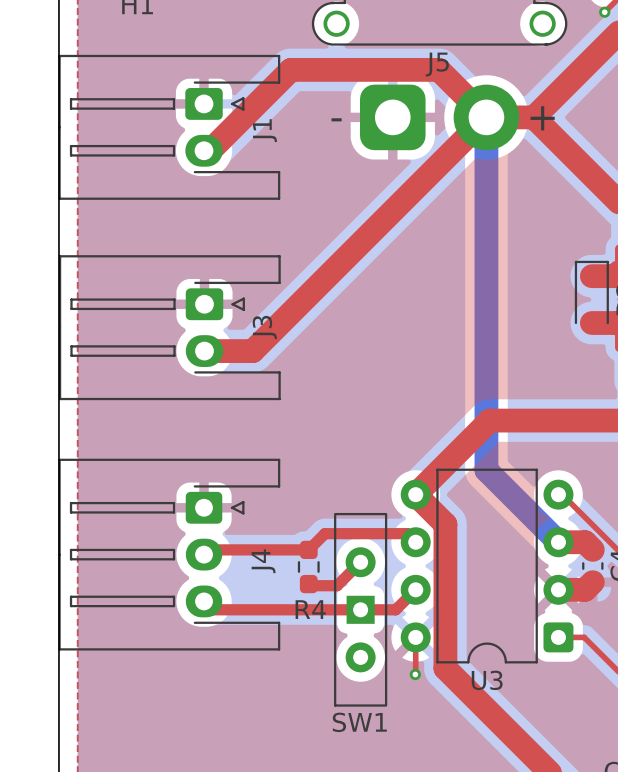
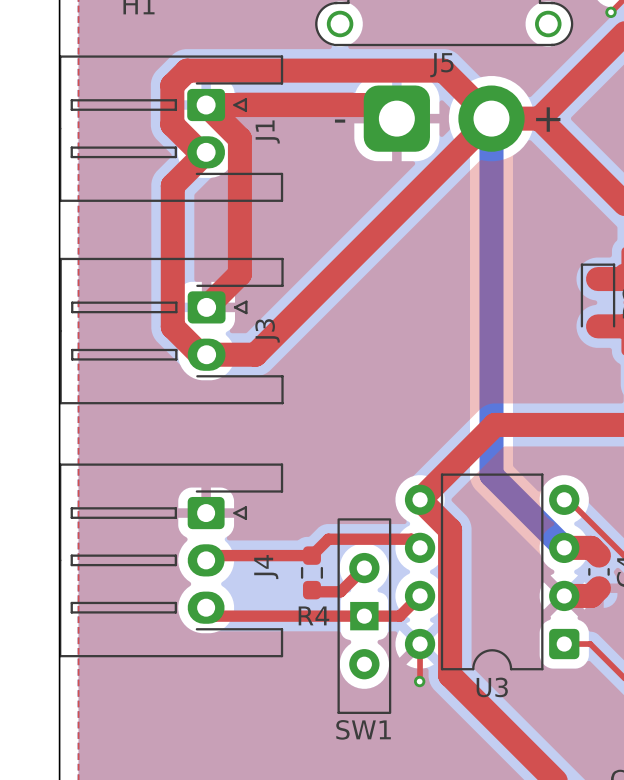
top track: (290, 69) (210, 150) (204, 150) -> (293, 70) (187, 70) (172, 85) (172, 124) (200, 152)
top track: none -> (383, 105) (206, 105) (239, 138) (239, 274) (206, 307)
top track: none -> (206, 152) (172, 185) (172, 327) (200, 354)

